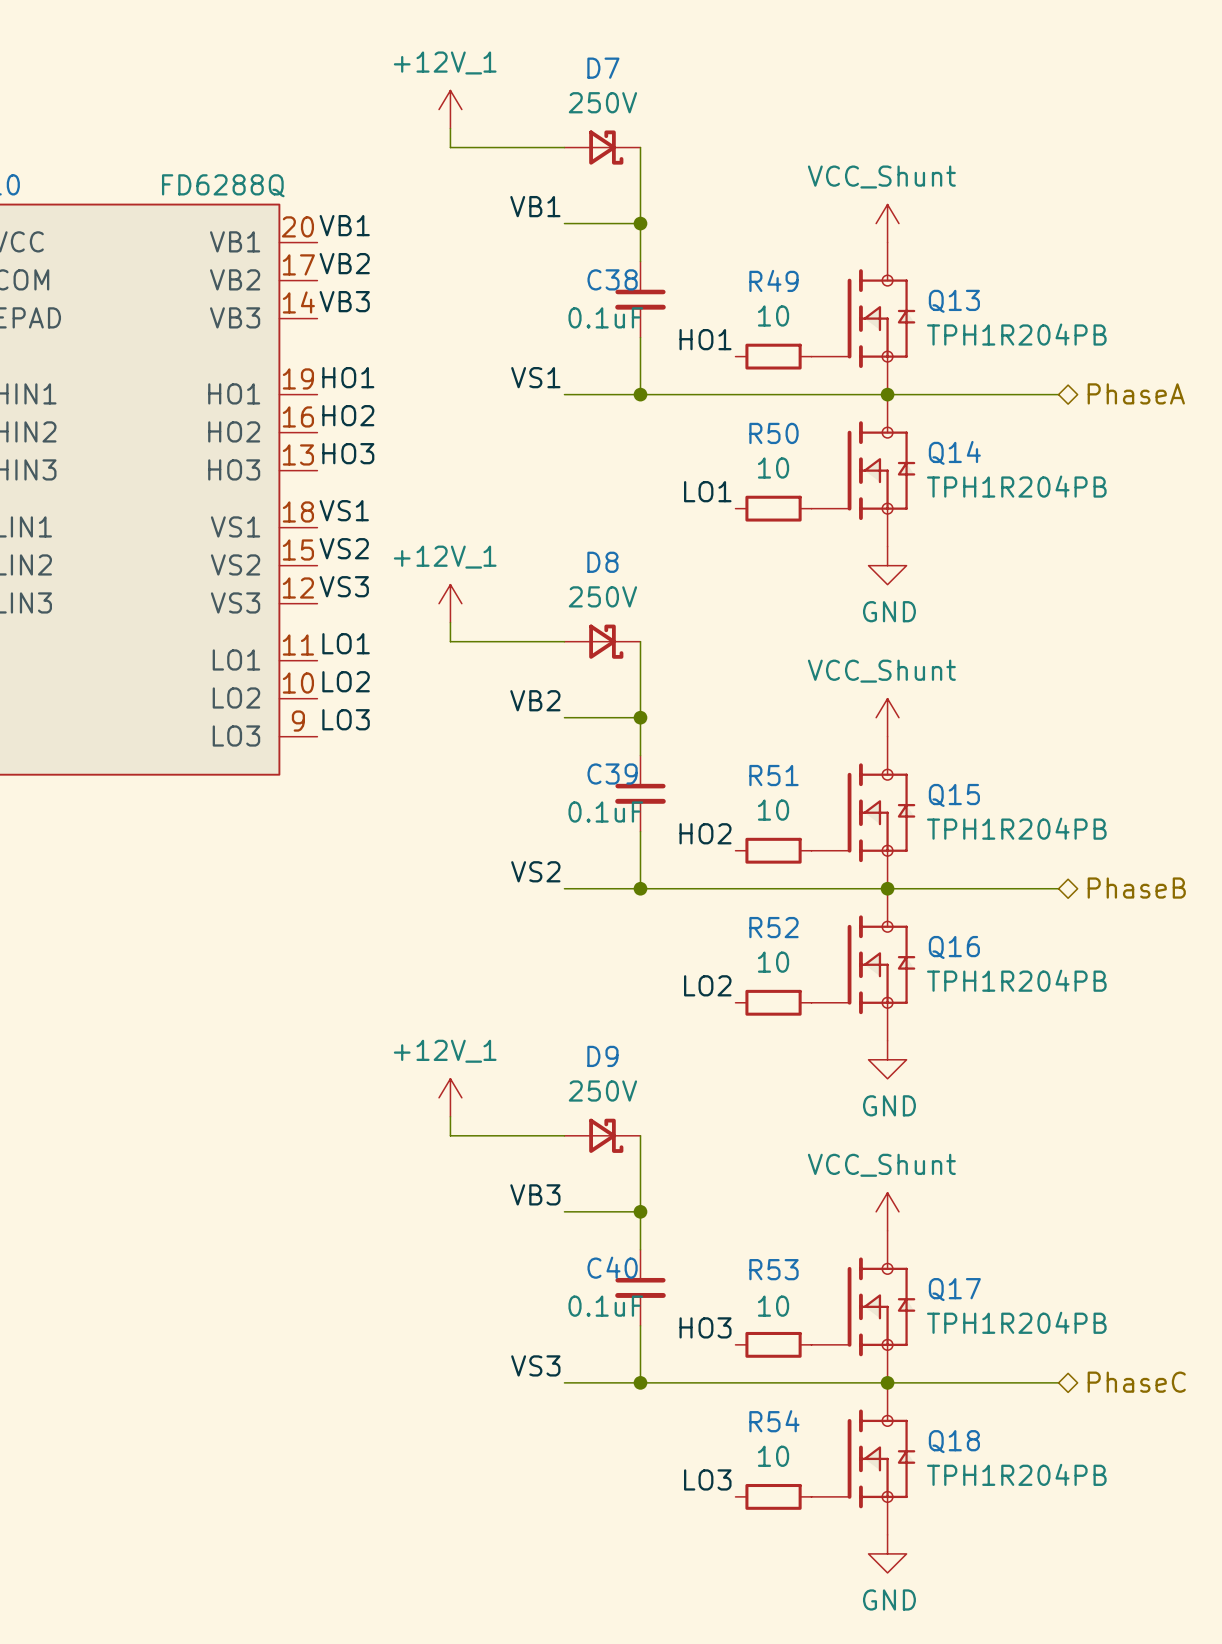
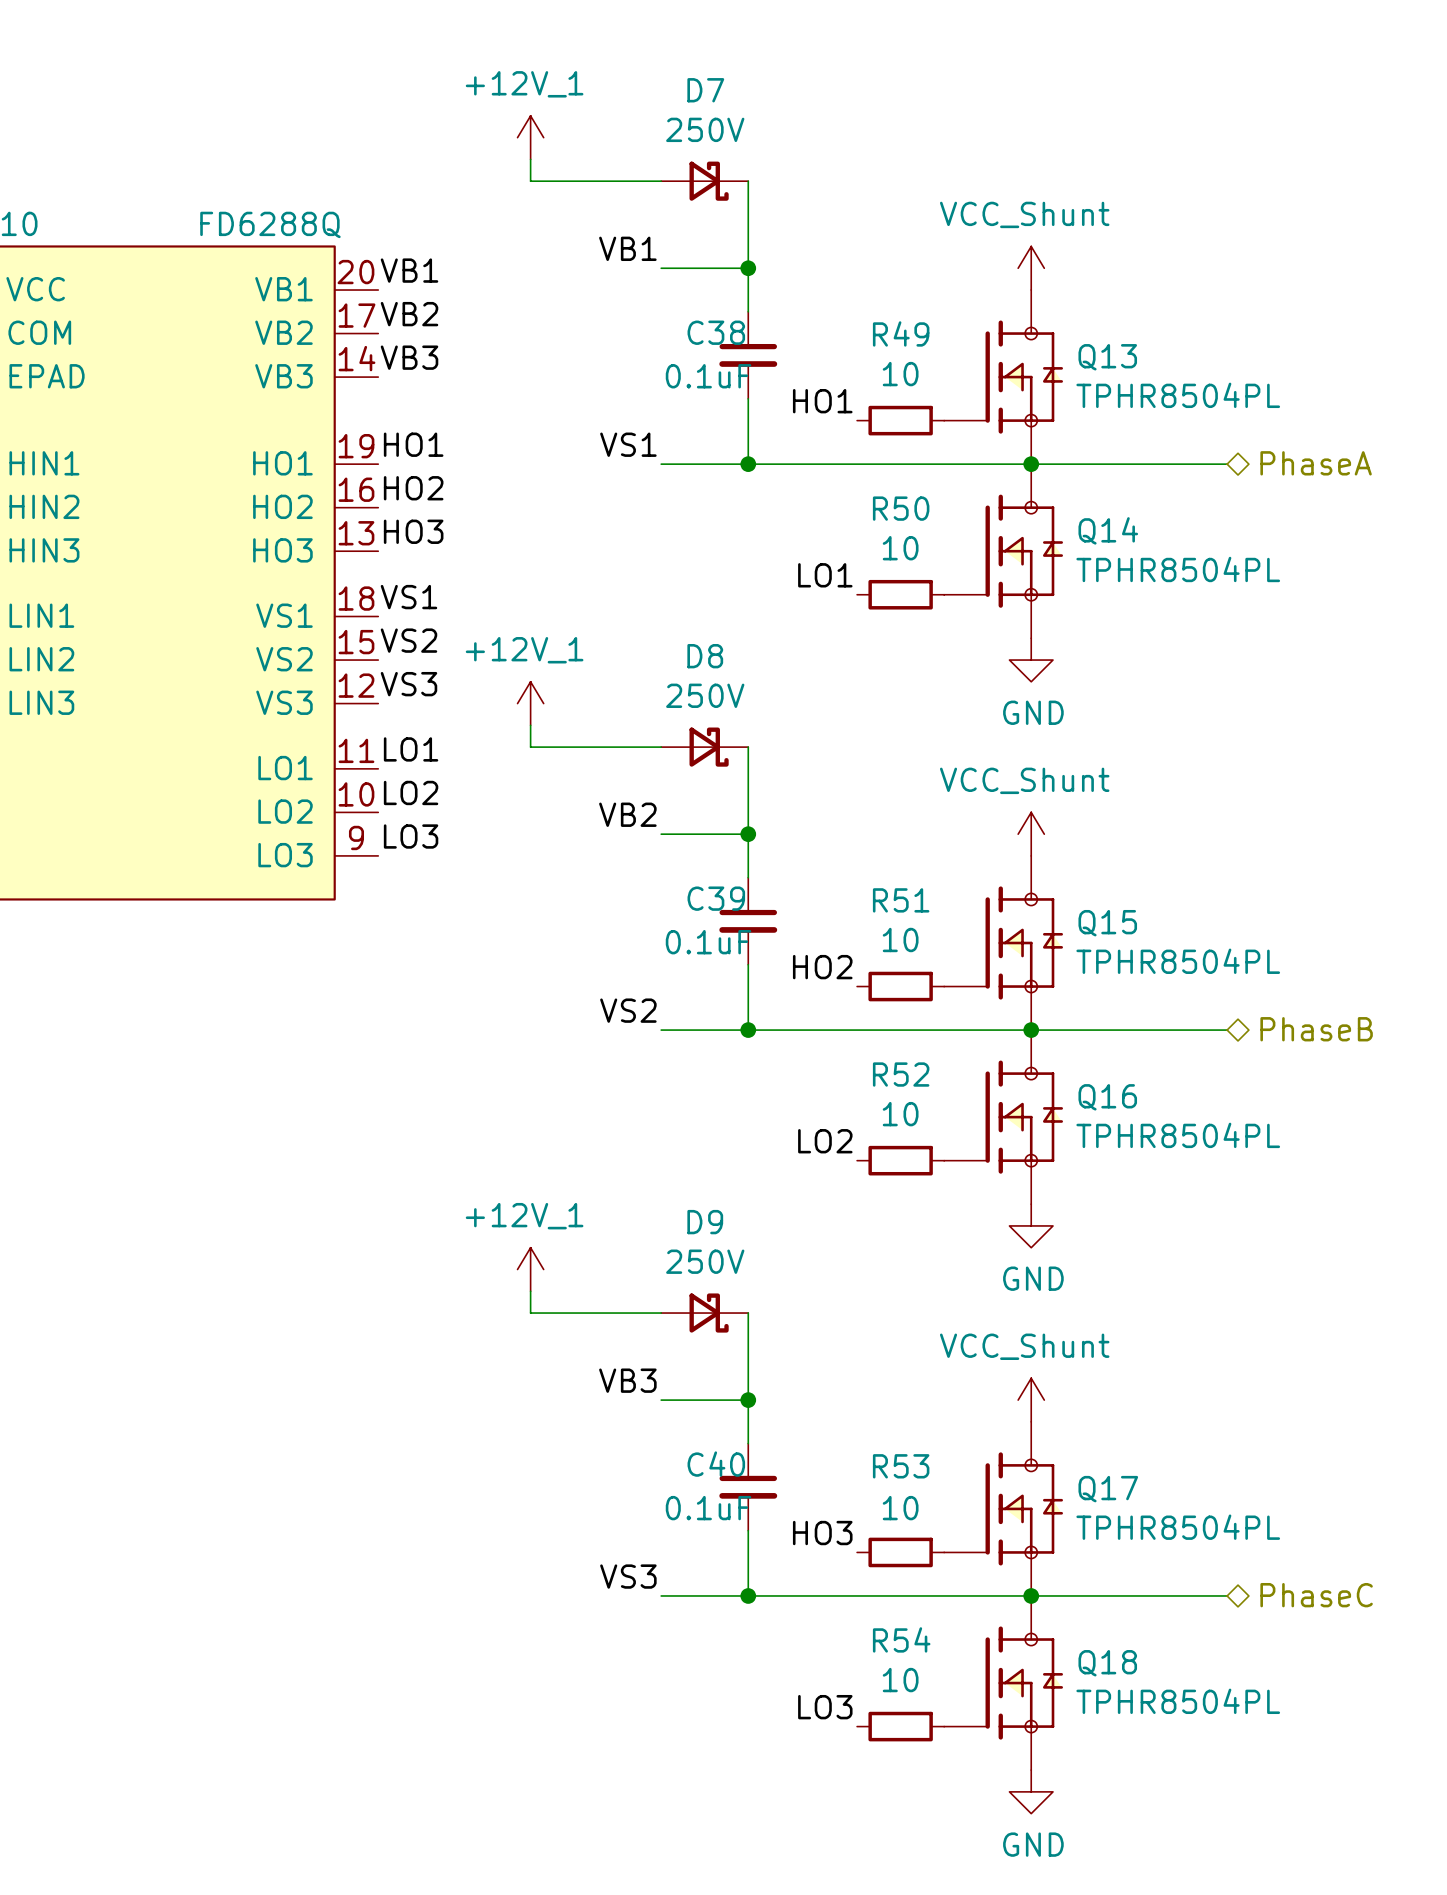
Q13 value: TPH1R204PB (1016, 334) -> TPHR8504PL (1178, 395)
Q14 value: TPH1R204PB (1016, 486) -> TPHR8504PL (1178, 569)
Q15 value: TPH1R204PB (1016, 828) -> TPHR8504PL (1178, 961)
Q16 value: TPH1R204PB (1016, 980) -> TPHR8504PL (1178, 1135)
Q17 value: TPH1R204PB (1016, 1322) -> TPHR8504PL (1178, 1527)
Q18 value: TPH1R204PB (1016, 1474) -> TPHR8504PL (1178, 1701)

